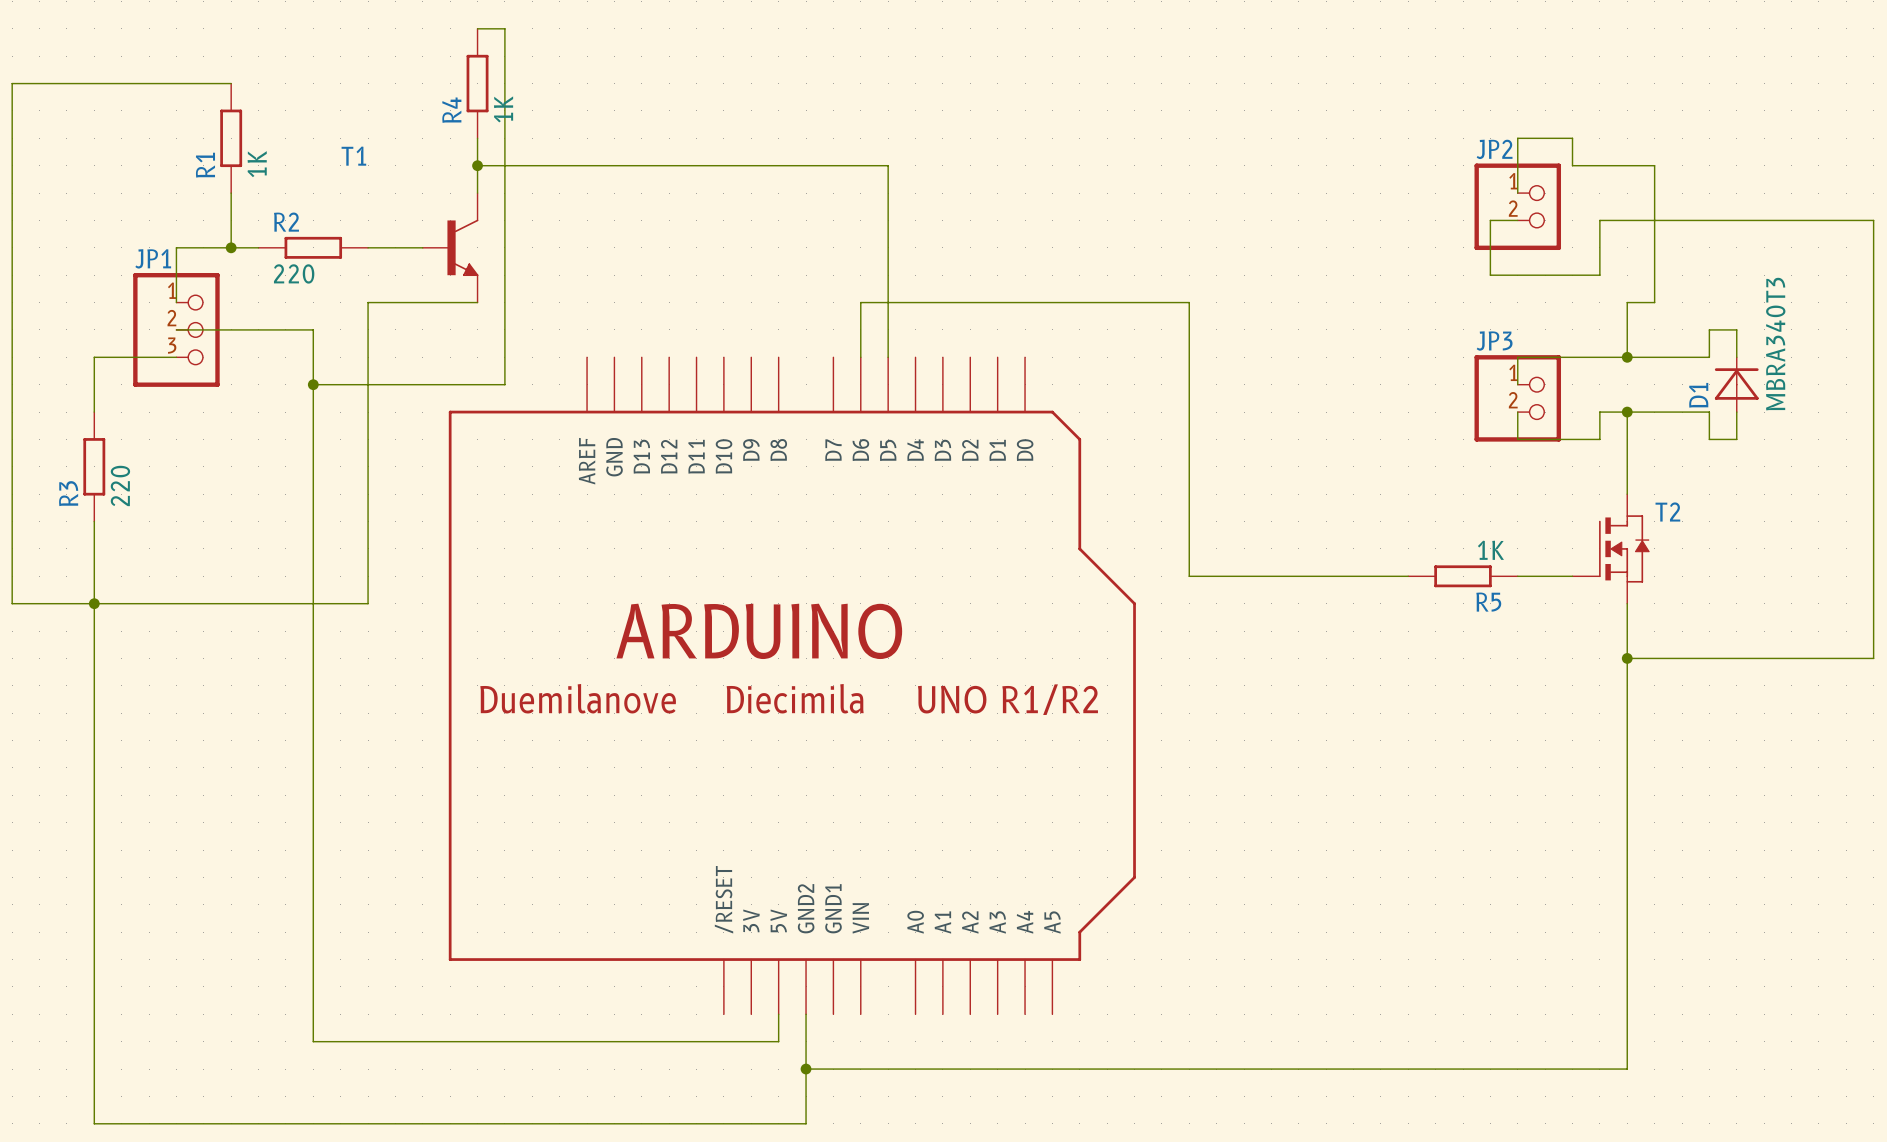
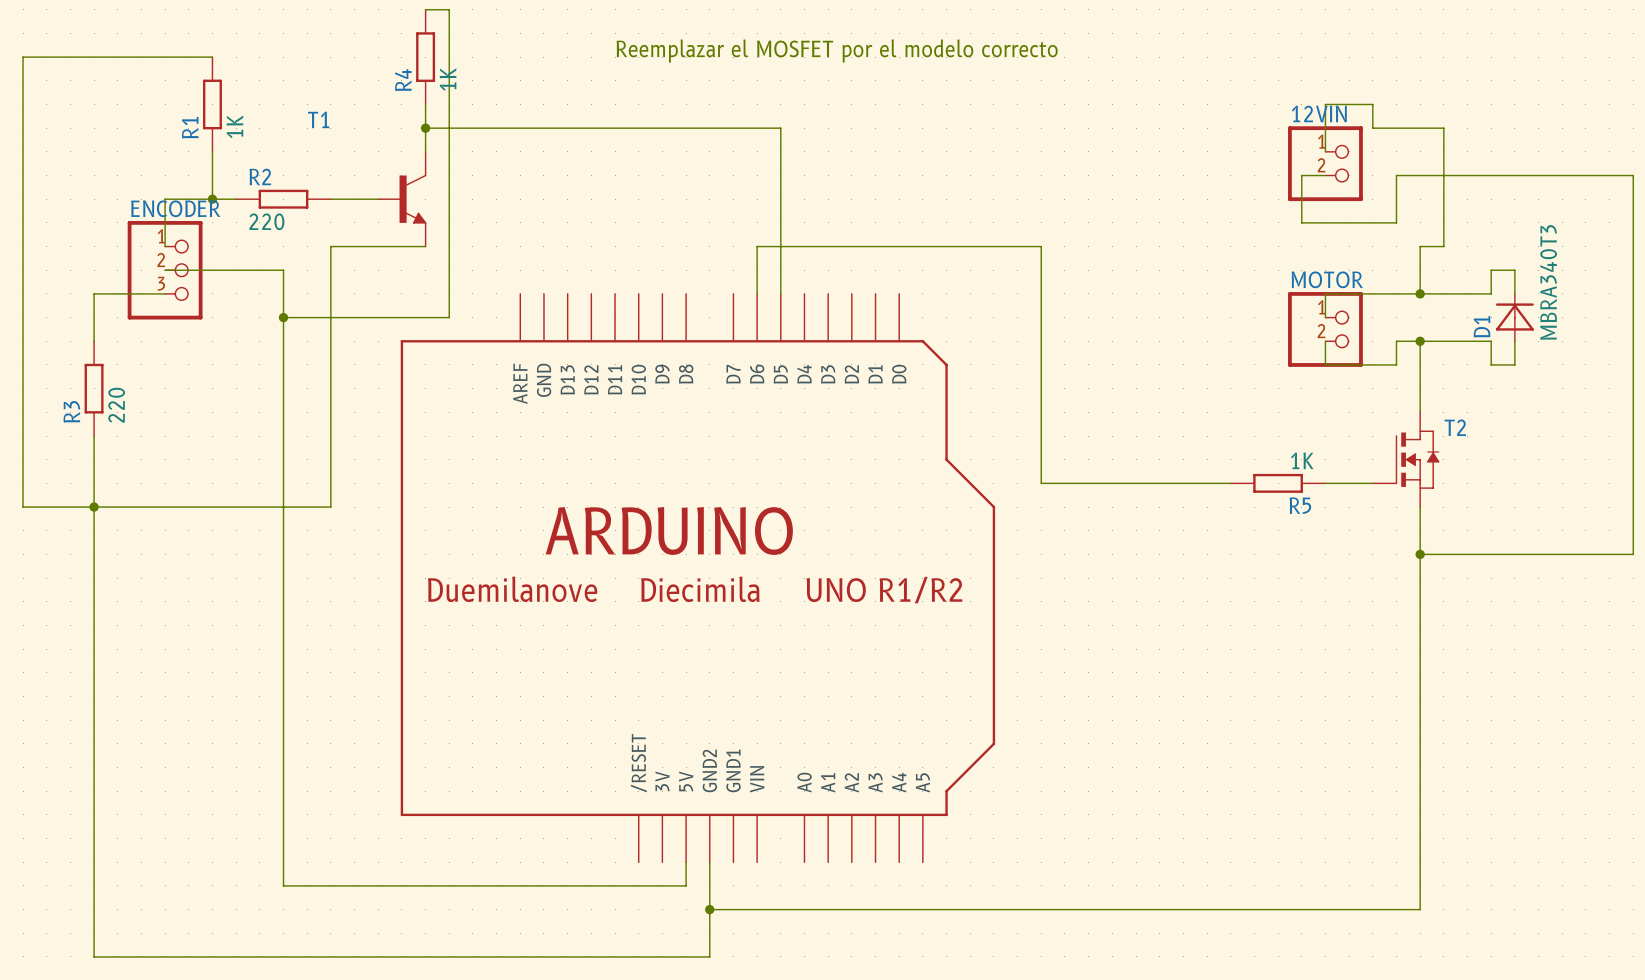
text: none -> Reemplazar el MOSFET por el modelo correcto (837, 51)
JP2 name: JP2 (1494, 149) -> 12VIN (1319, 114)
JP1 name: JP1 (153, 258) -> ENCODER (175, 208)
JP3 name: JP3 (1494, 341) -> MOTOR (1327, 279)

